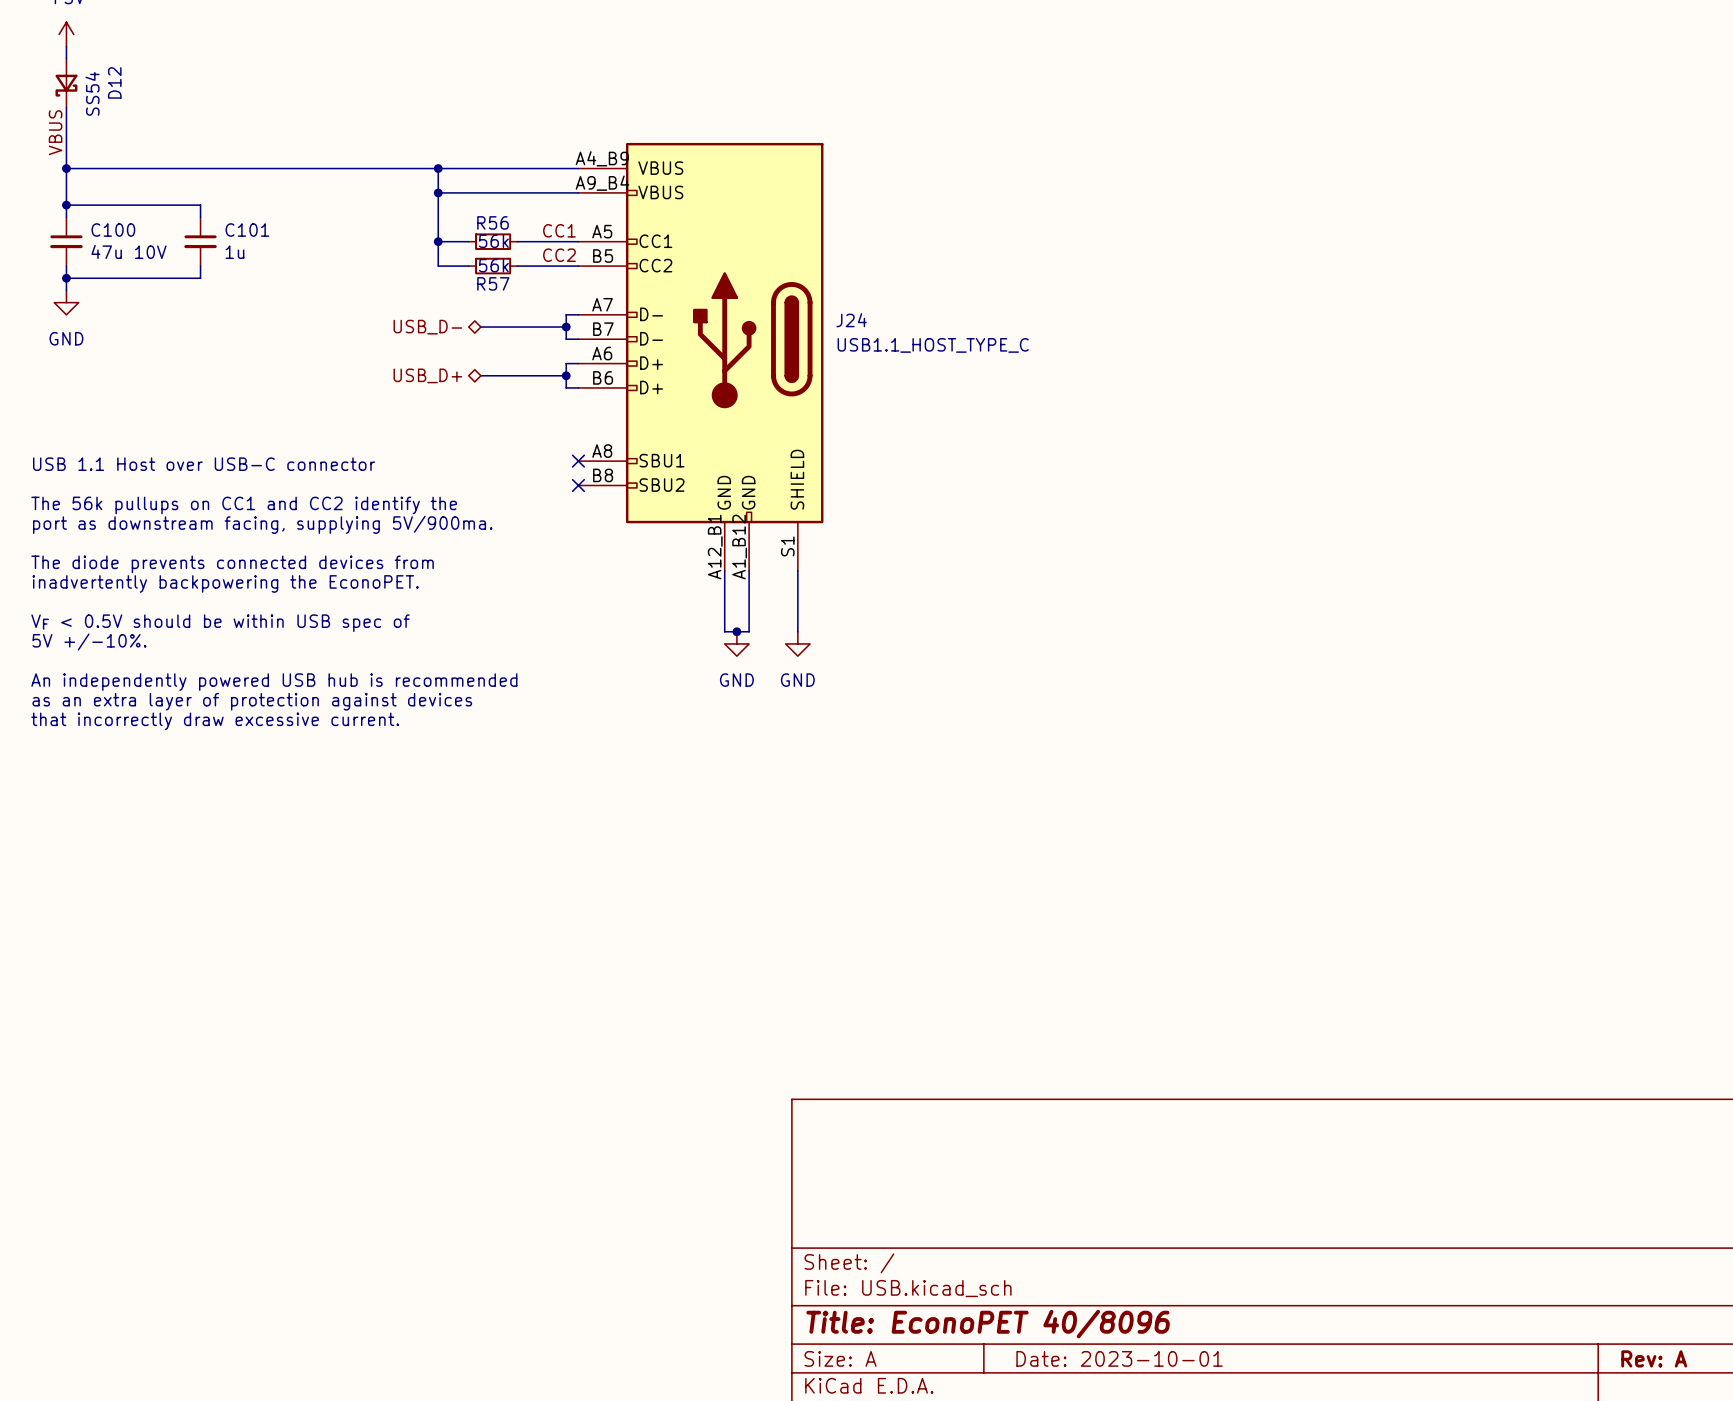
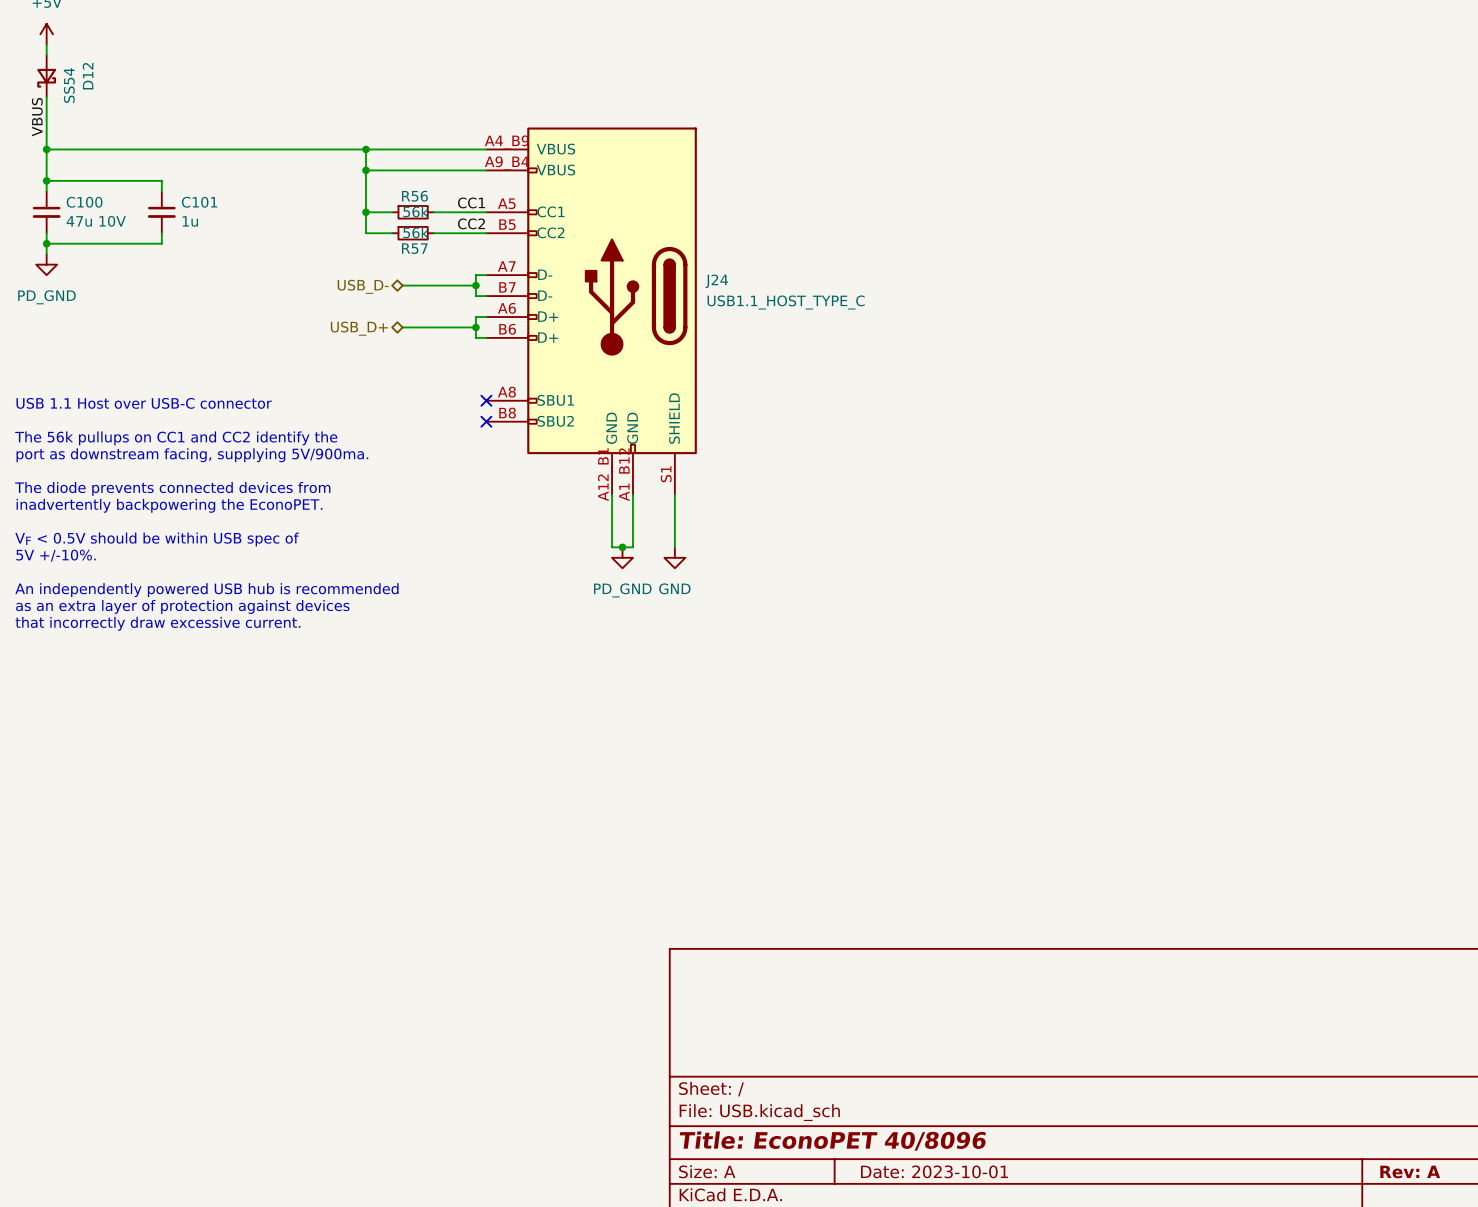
power symbol: GND (66, 302) -> PD_GND (46, 264)
power symbol: GND (736, 643) -> PD_GND (622, 557)

